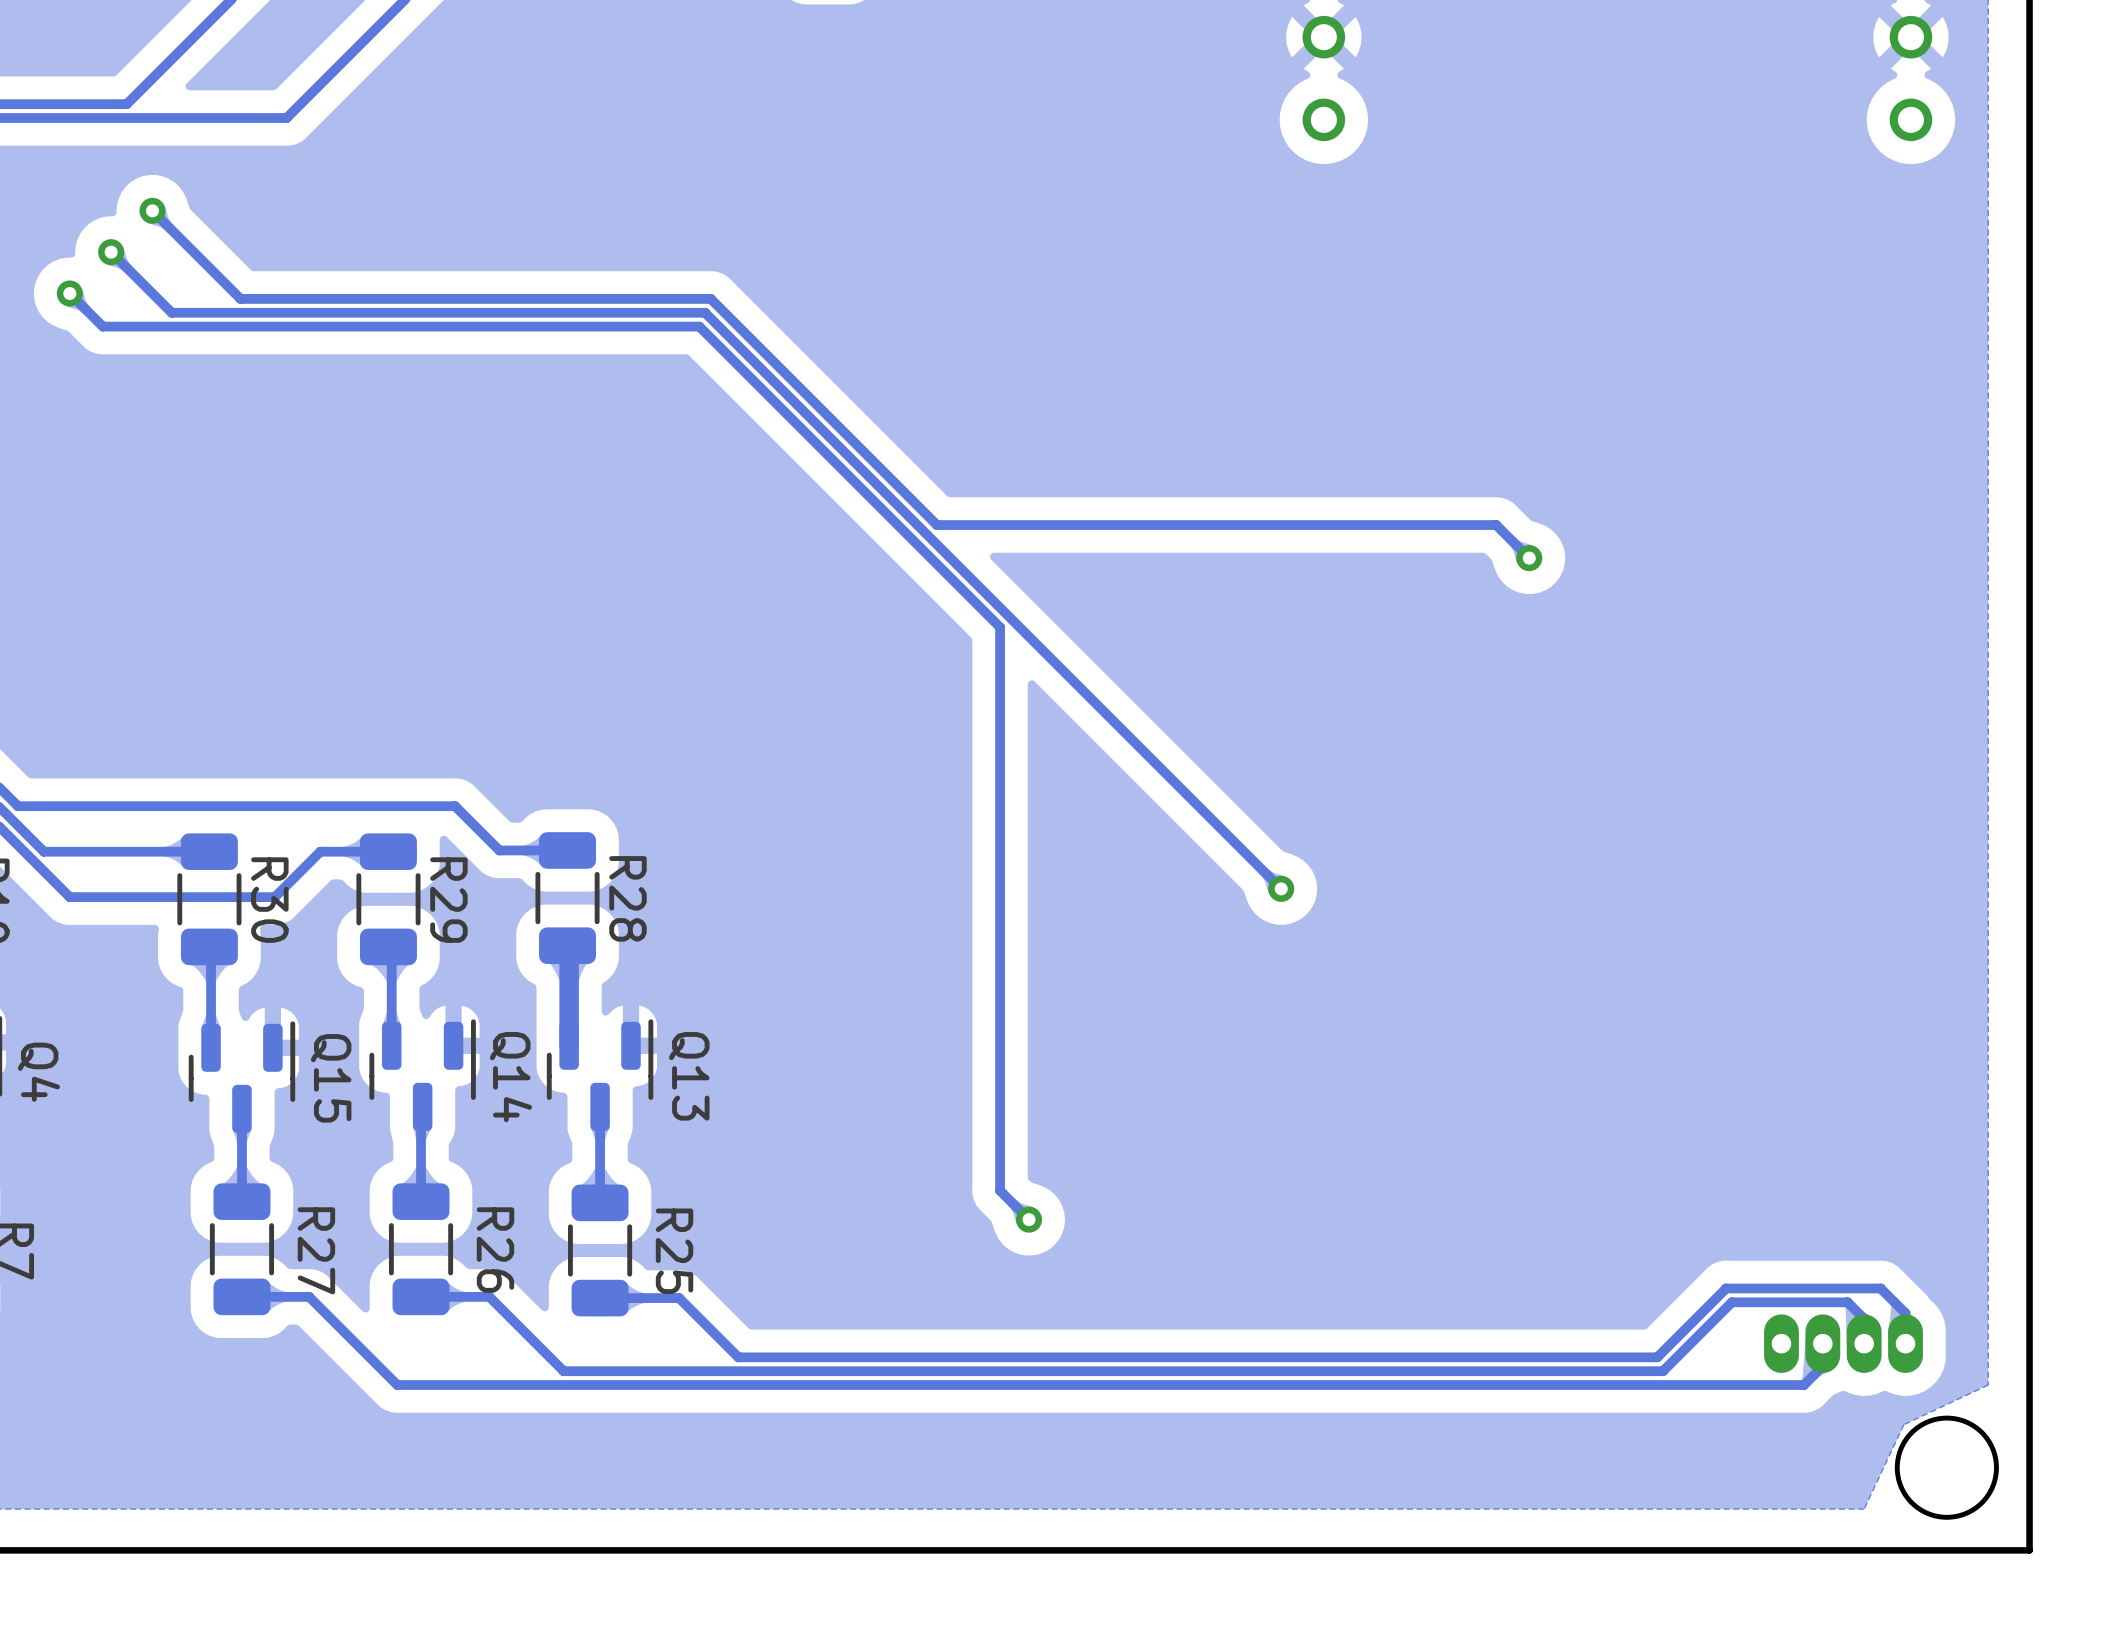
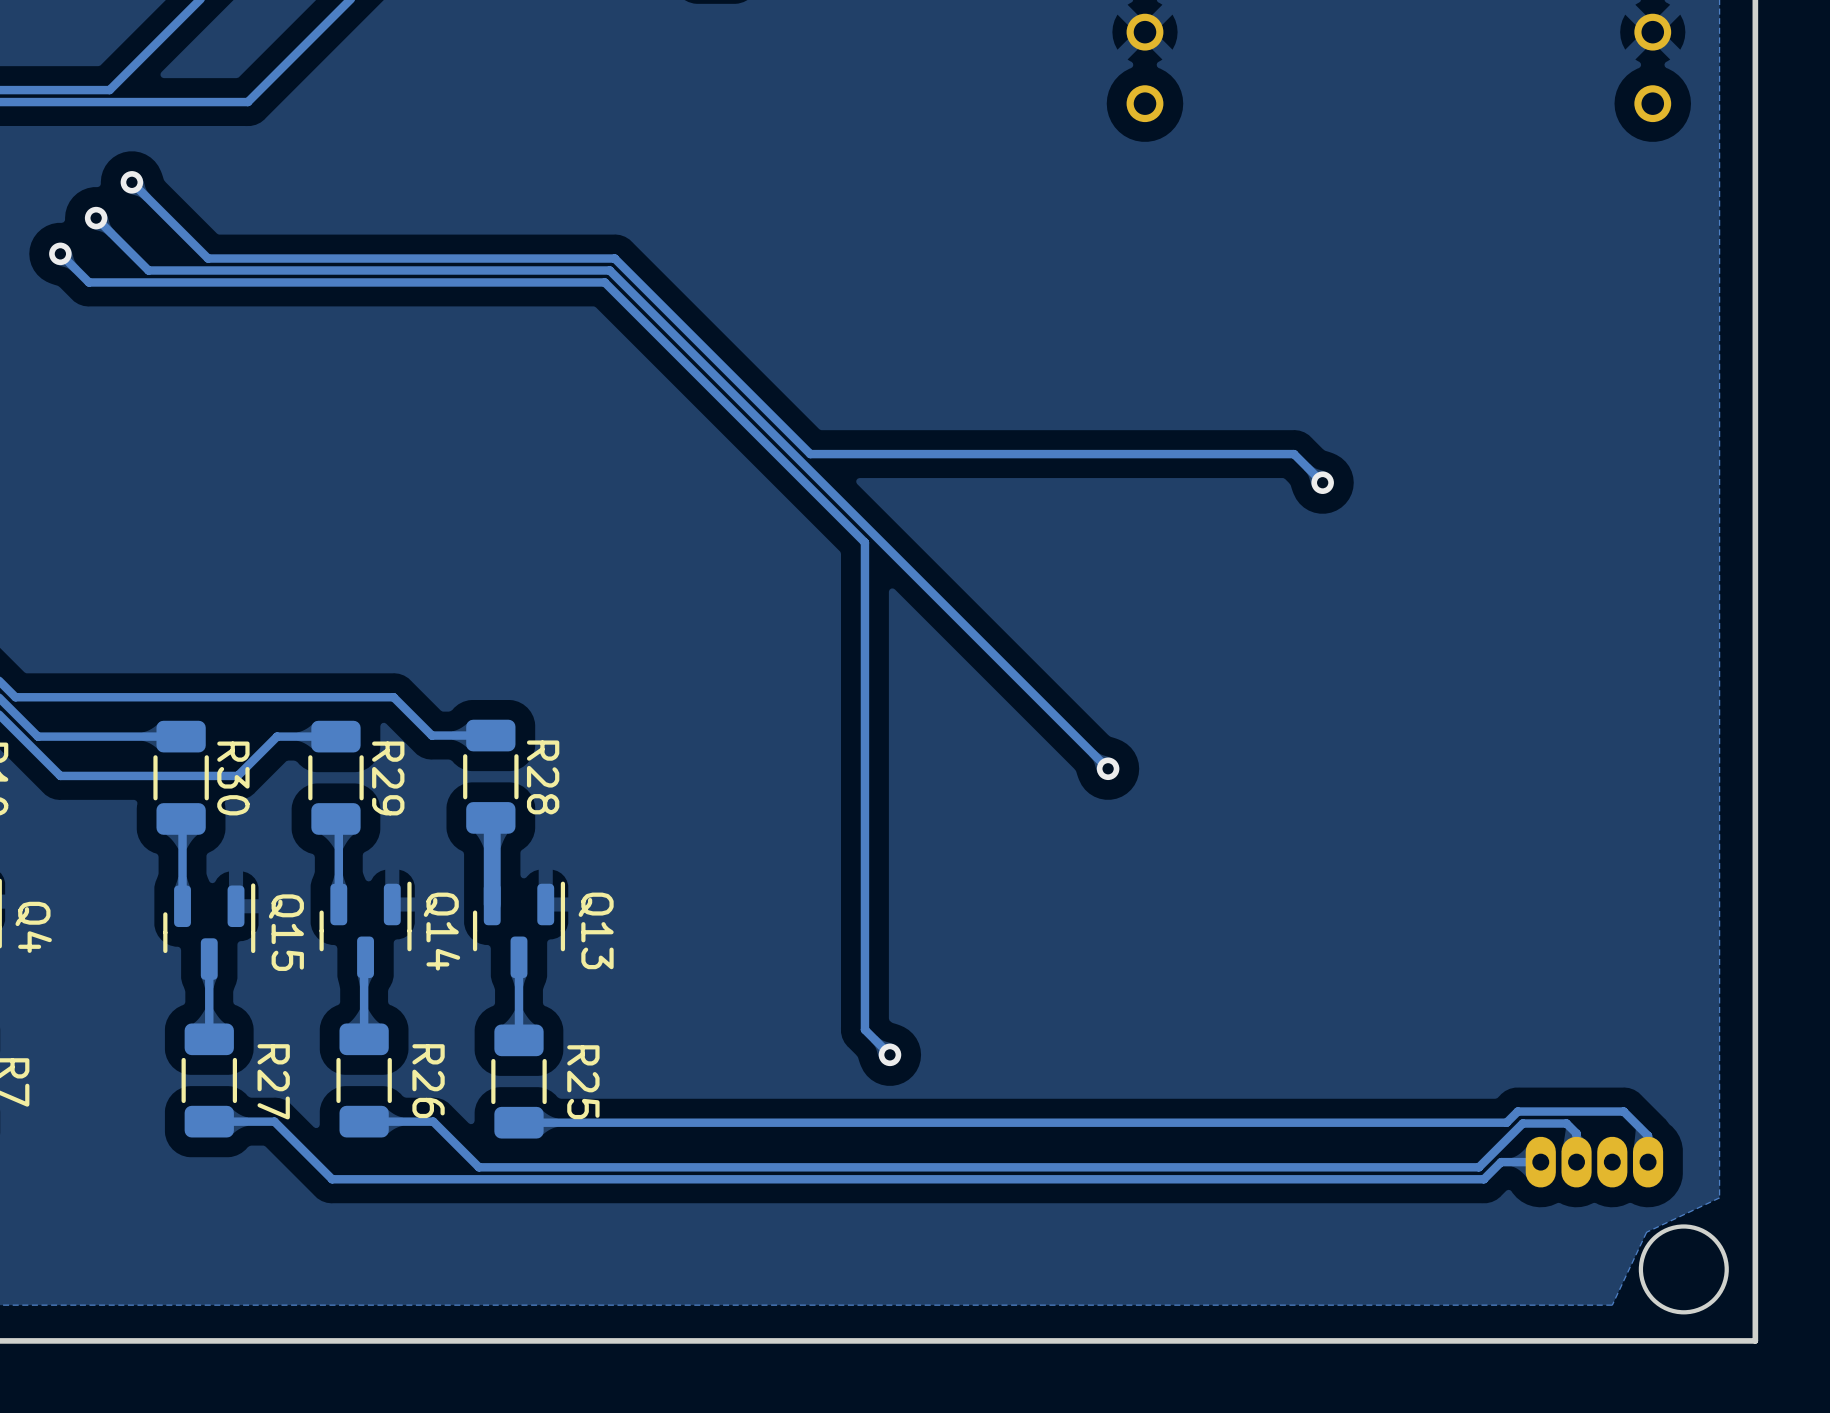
track: (1880, 1288) (1726, 1288) (1657, 1357) (738, 1357) (679, 1298) -> (1626, 1114) (1623, 1111) (1517, 1111) (1506, 1122) (587, 1122)
track: (309, 1296) (397, 1385) (1803, 1385) (1822, 1366) (1822, 1343) -> (267, 1121) (274, 1121) (332, 1179) (1483, 1179) (1501, 1162) (1540, 1162)
track: (489, 1296) (563, 1371) (1663, 1371) (1731, 1302) (1847, 1302) (1864, 1318) (1864, 1343) -> (423, 1121) (433, 1121) (478, 1167) (1478, 1167) (1522, 1123) (1566, 1123) (1576, 1133) (1576, 1162)

